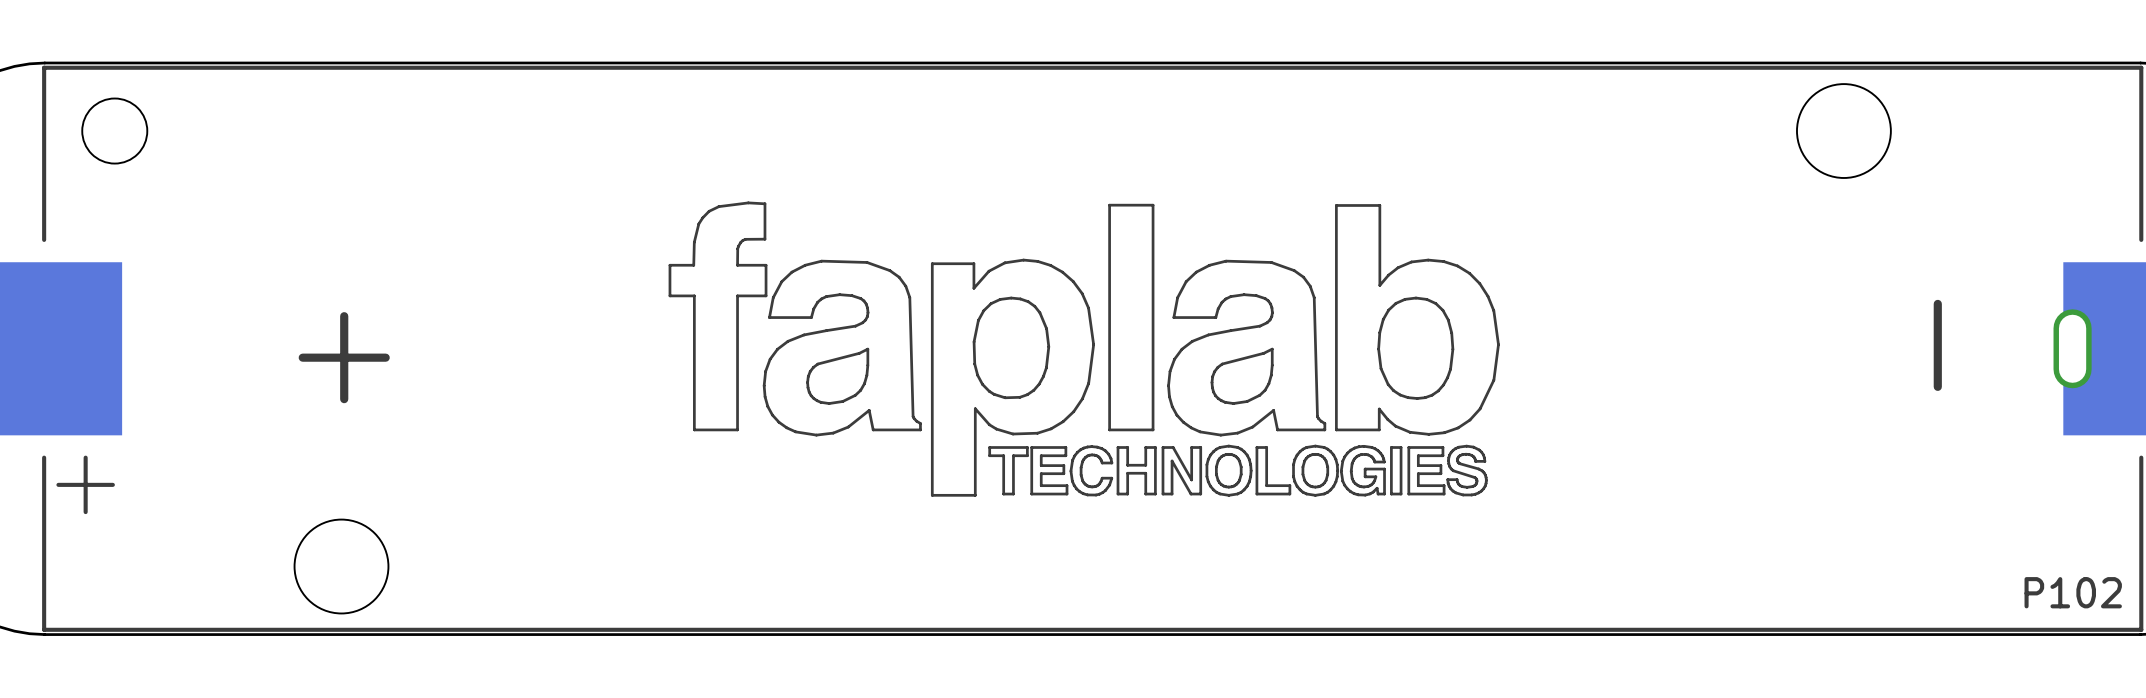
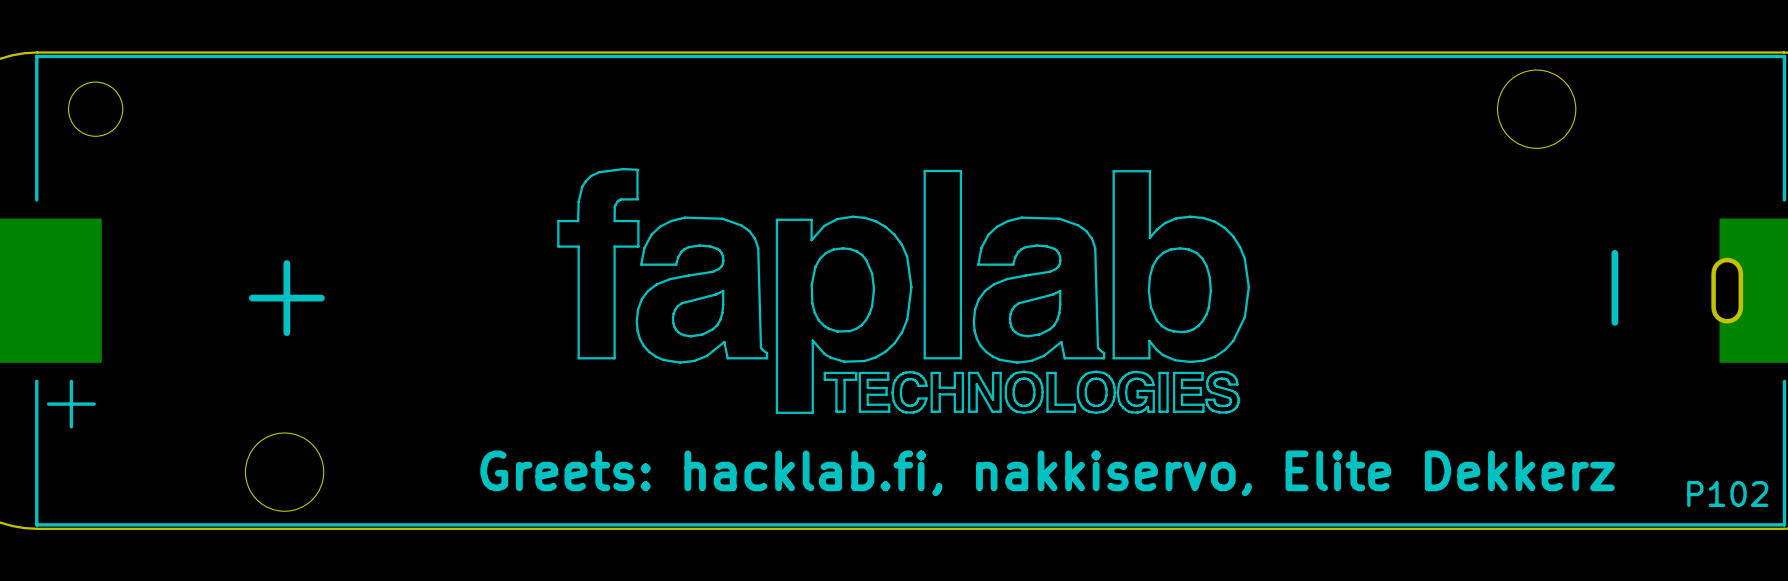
text: none -> Greets: hacklab.fi, nakkiservo, Elite Dekkerz (1047, 473)

